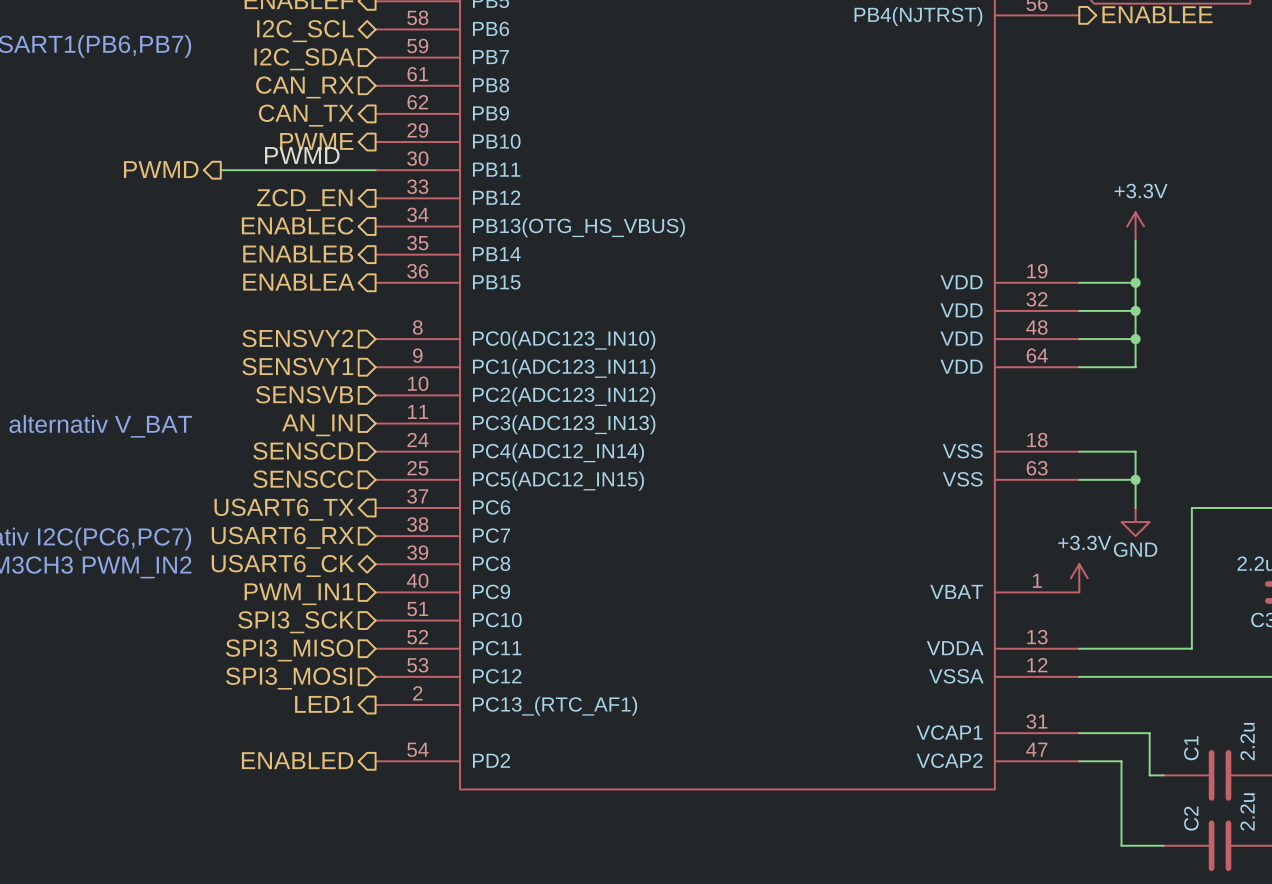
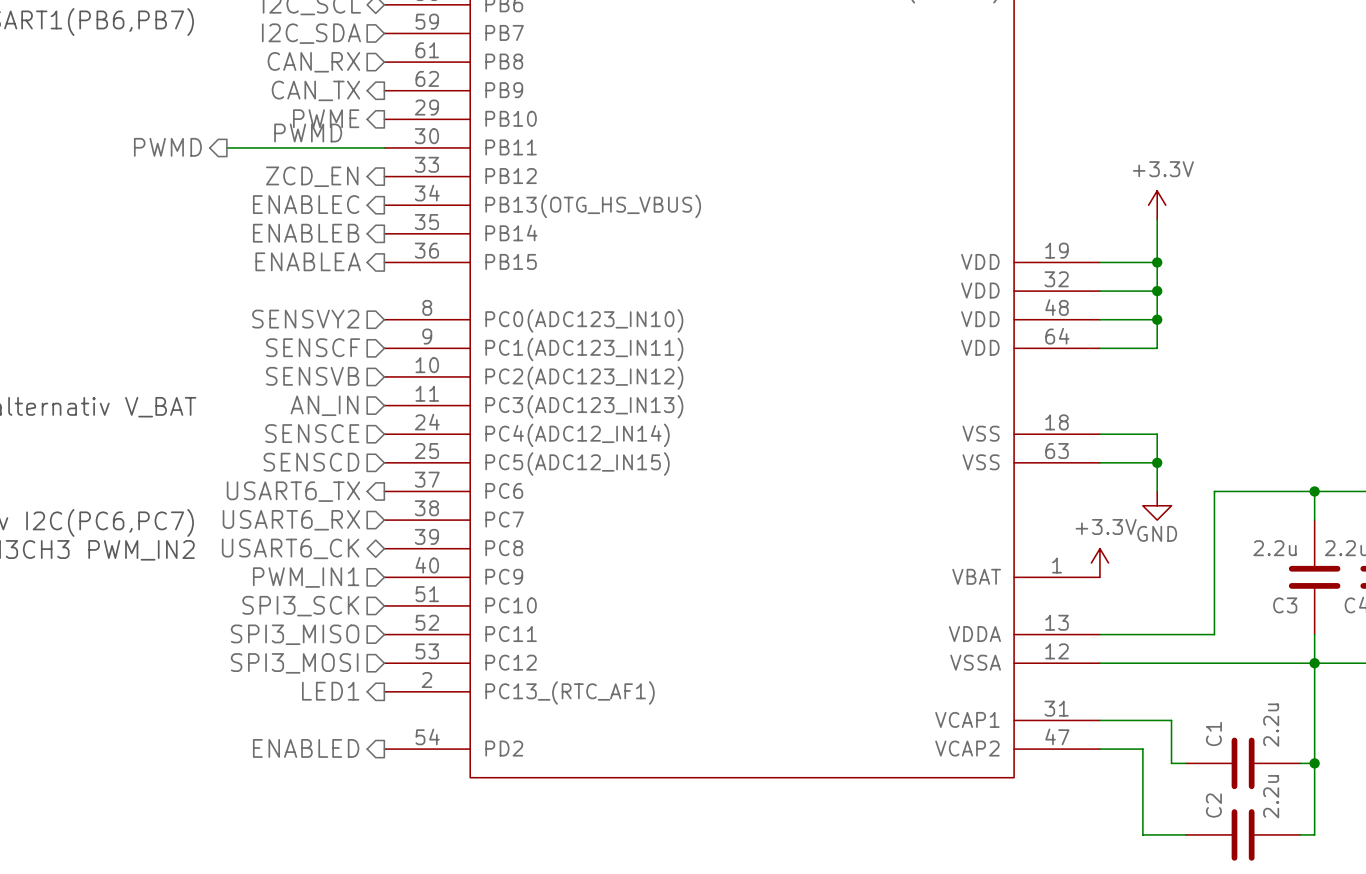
hierarchical label: SENSVY1 (297, 366) -> SENSCF (313, 347)
hierarchical label: SENSCD (303, 451) -> SENSCE (312, 433)
hierarchical label: SENSCC (303, 479) -> SENSCD (311, 462)

